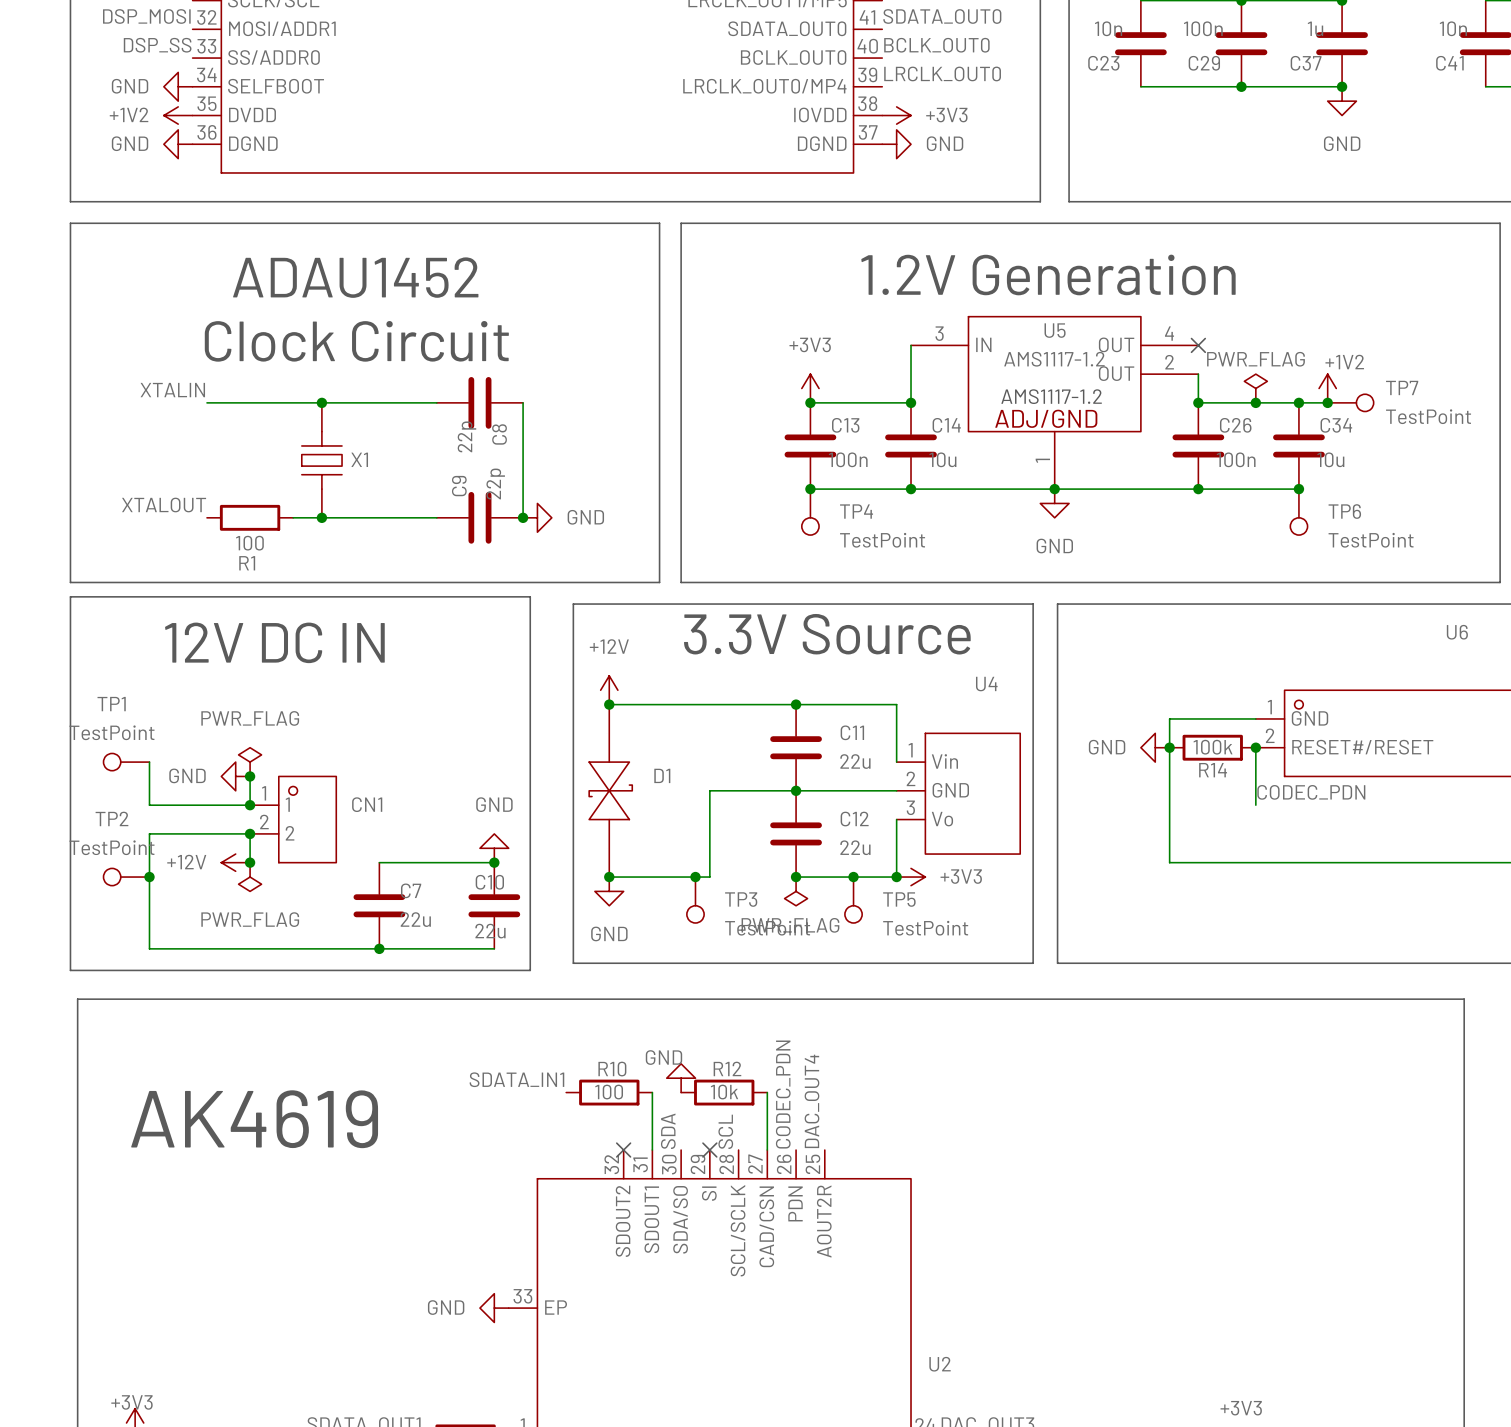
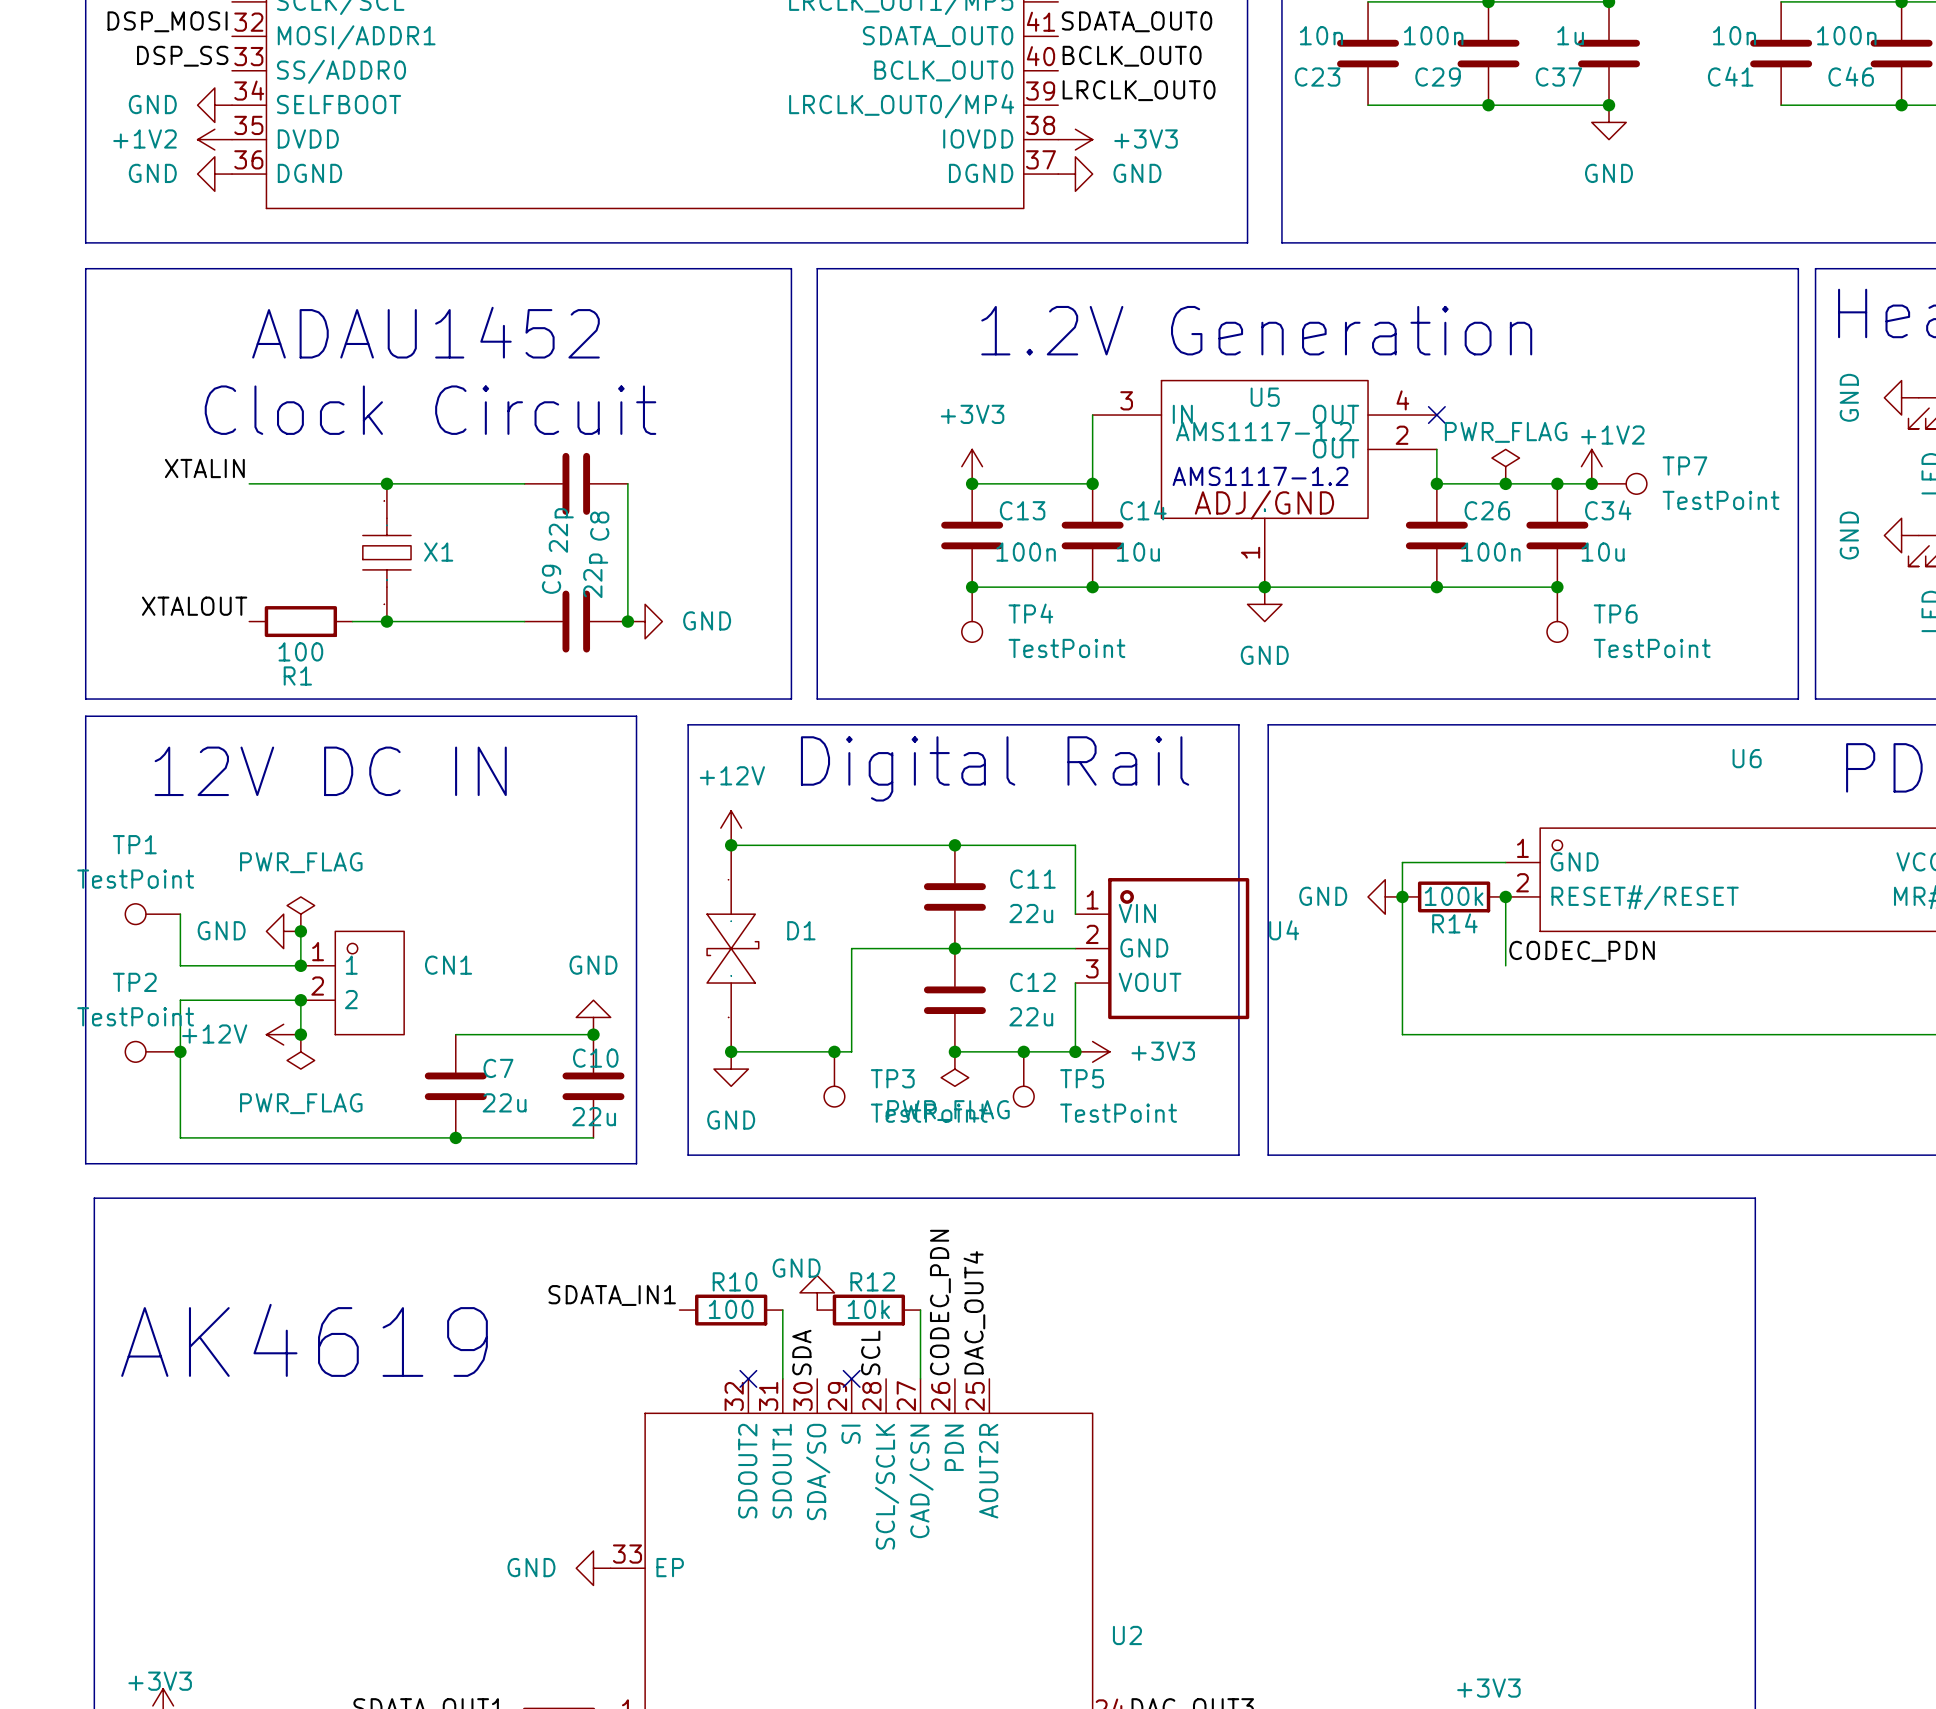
text: 3.3V Source (827, 634) -> Digital Rail (995, 768)
U4 name position: U4 (986, 684) -> U4 (1284, 930)
U4 symbol: [896, 733, 1021, 855] -> [1075, 878, 1250, 1020]

